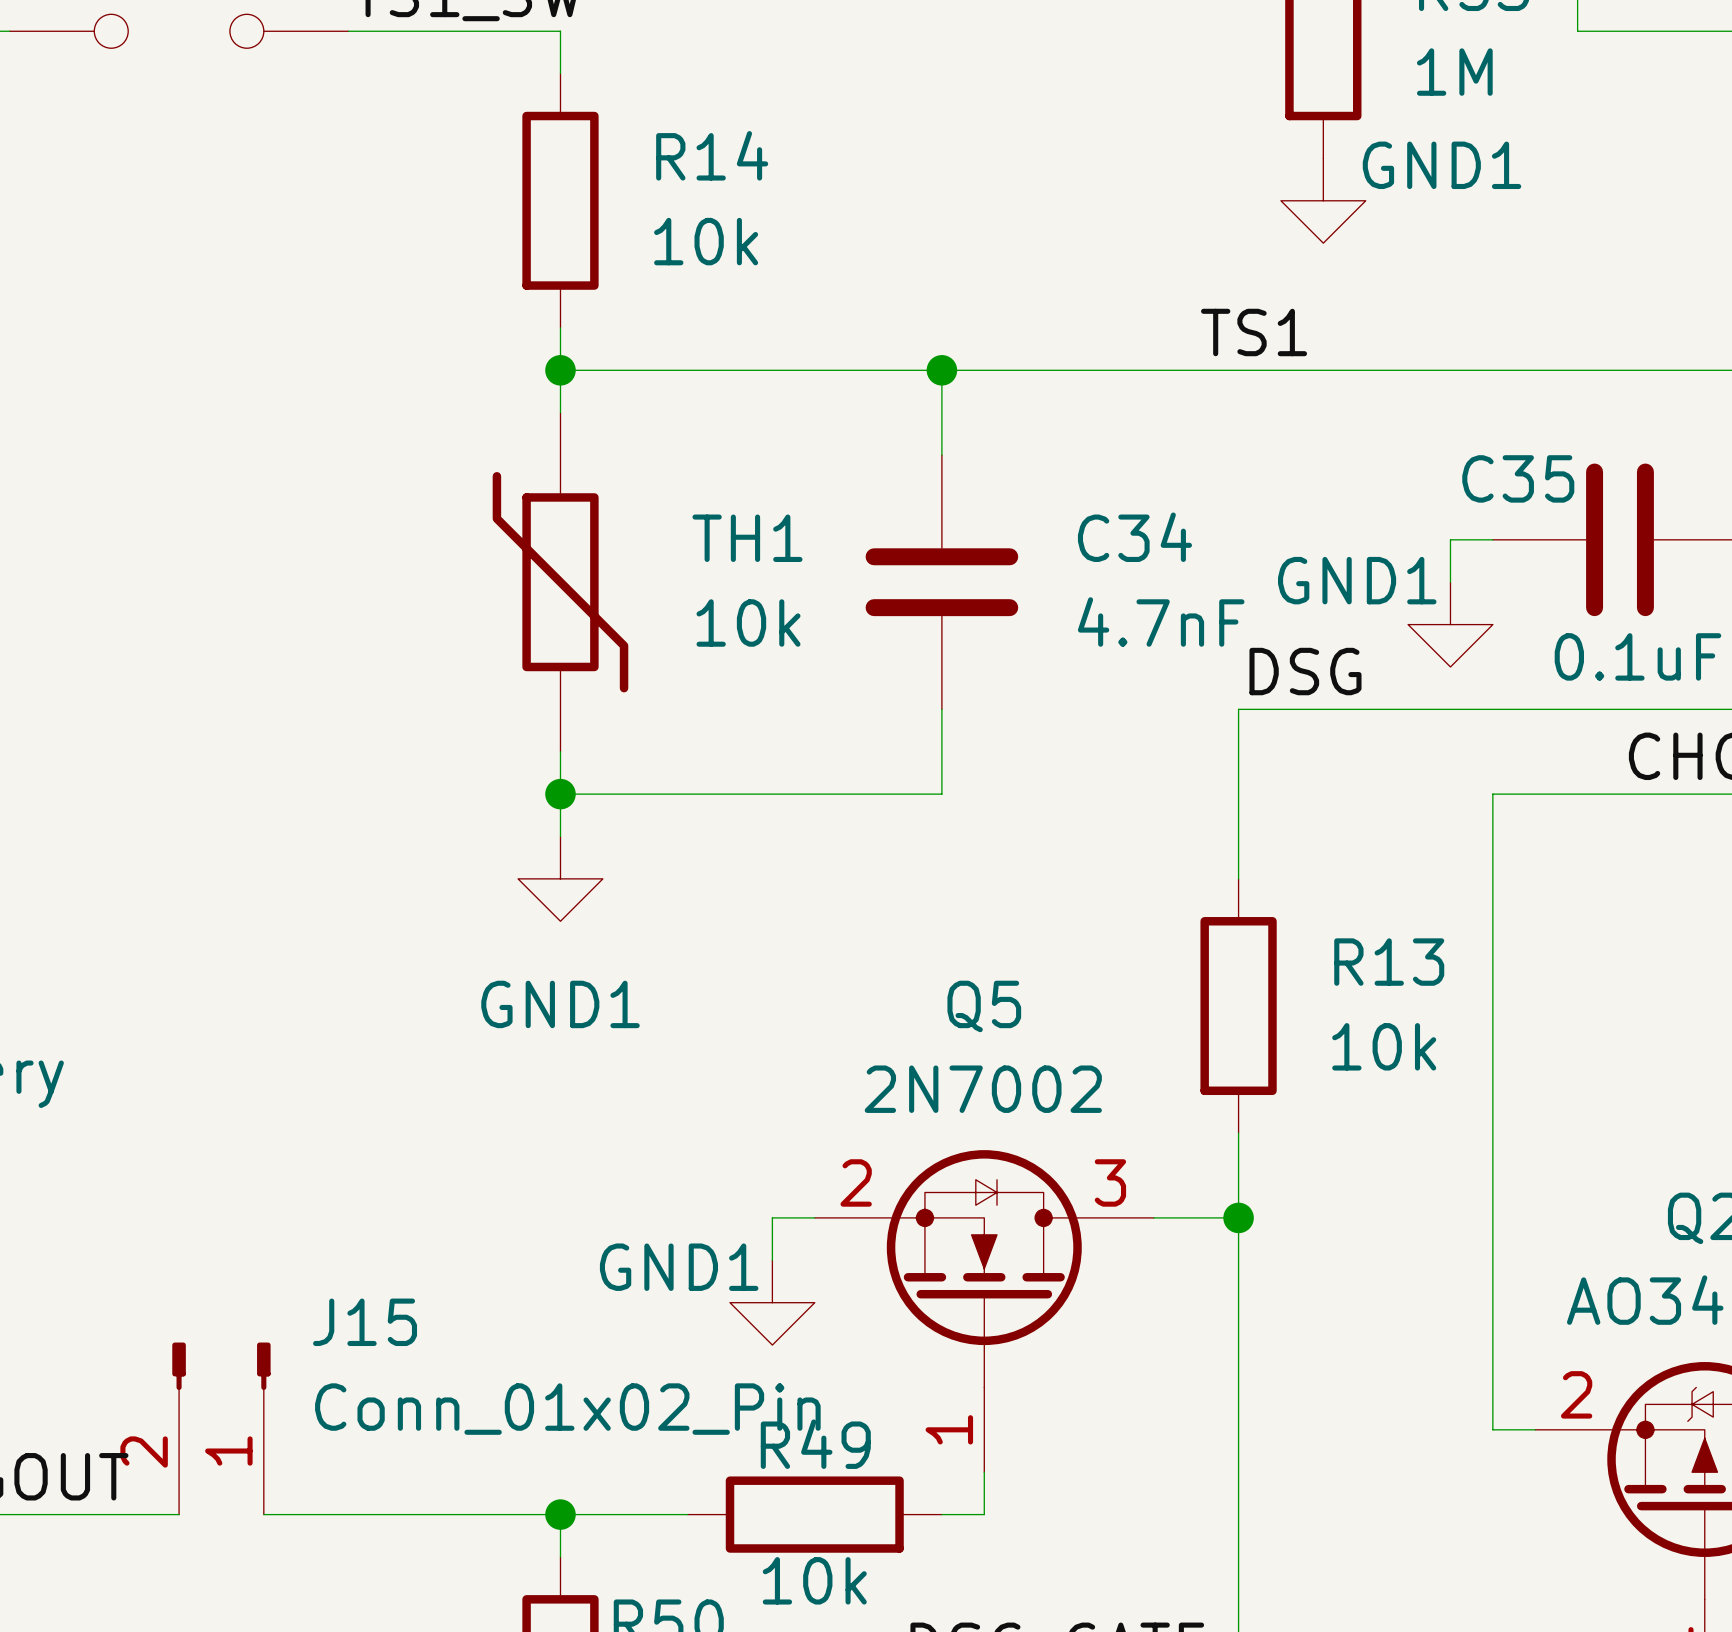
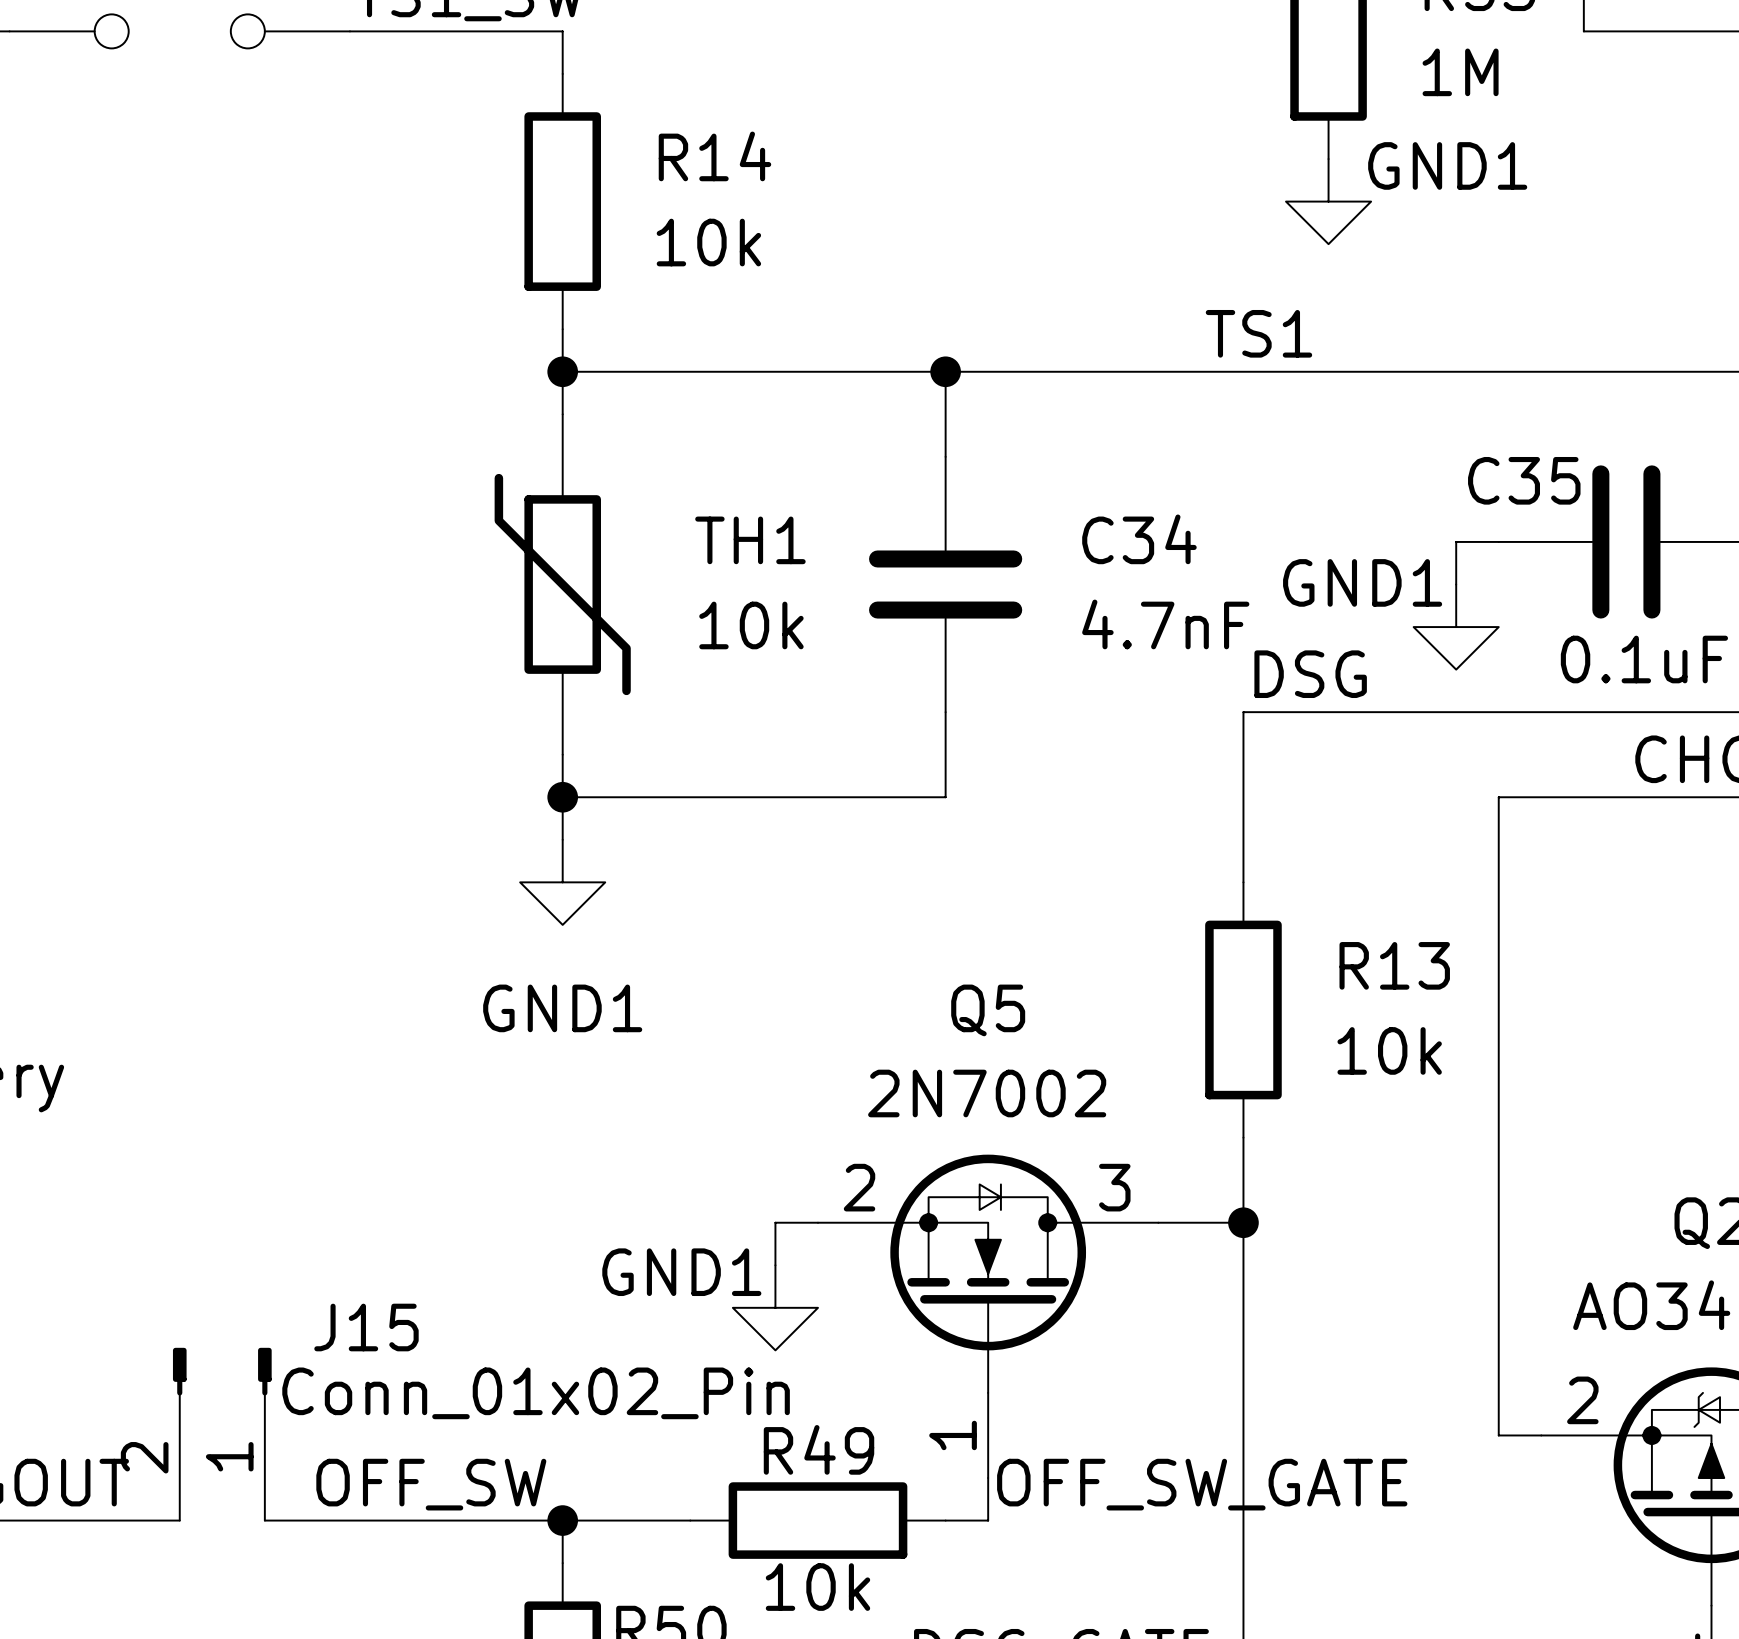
J15 value position: Conn_01x02_Pin (567, 1409) -> Conn_01x02_Pin (536, 1393)
label: none -> OFF_SW (431, 1484)
label: none -> OFF_SW_GATE (1202, 1484)

